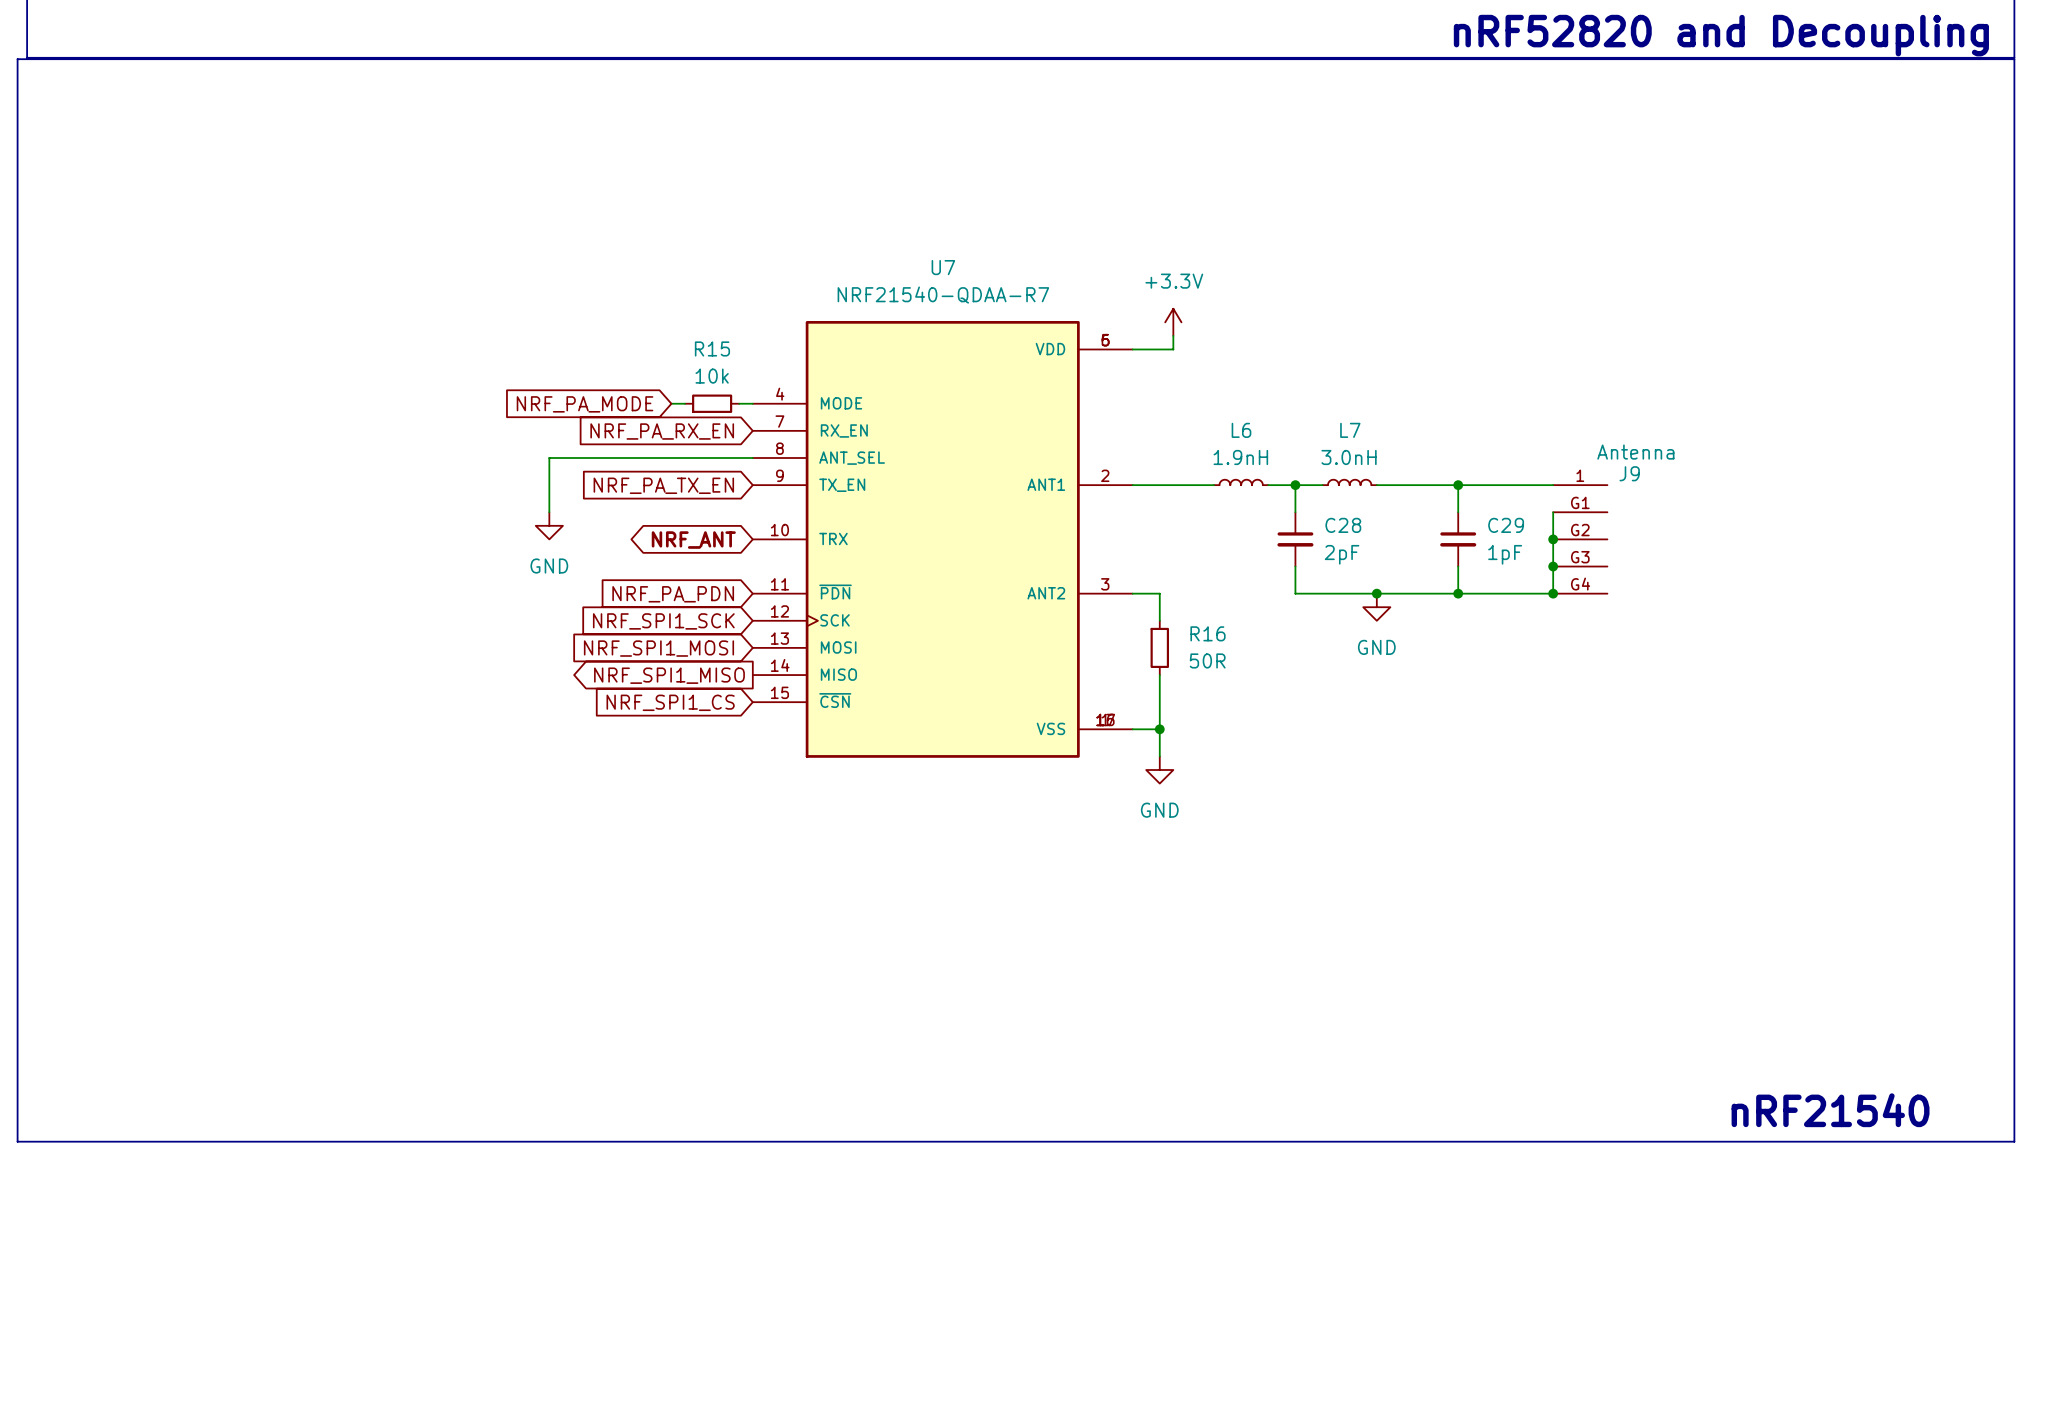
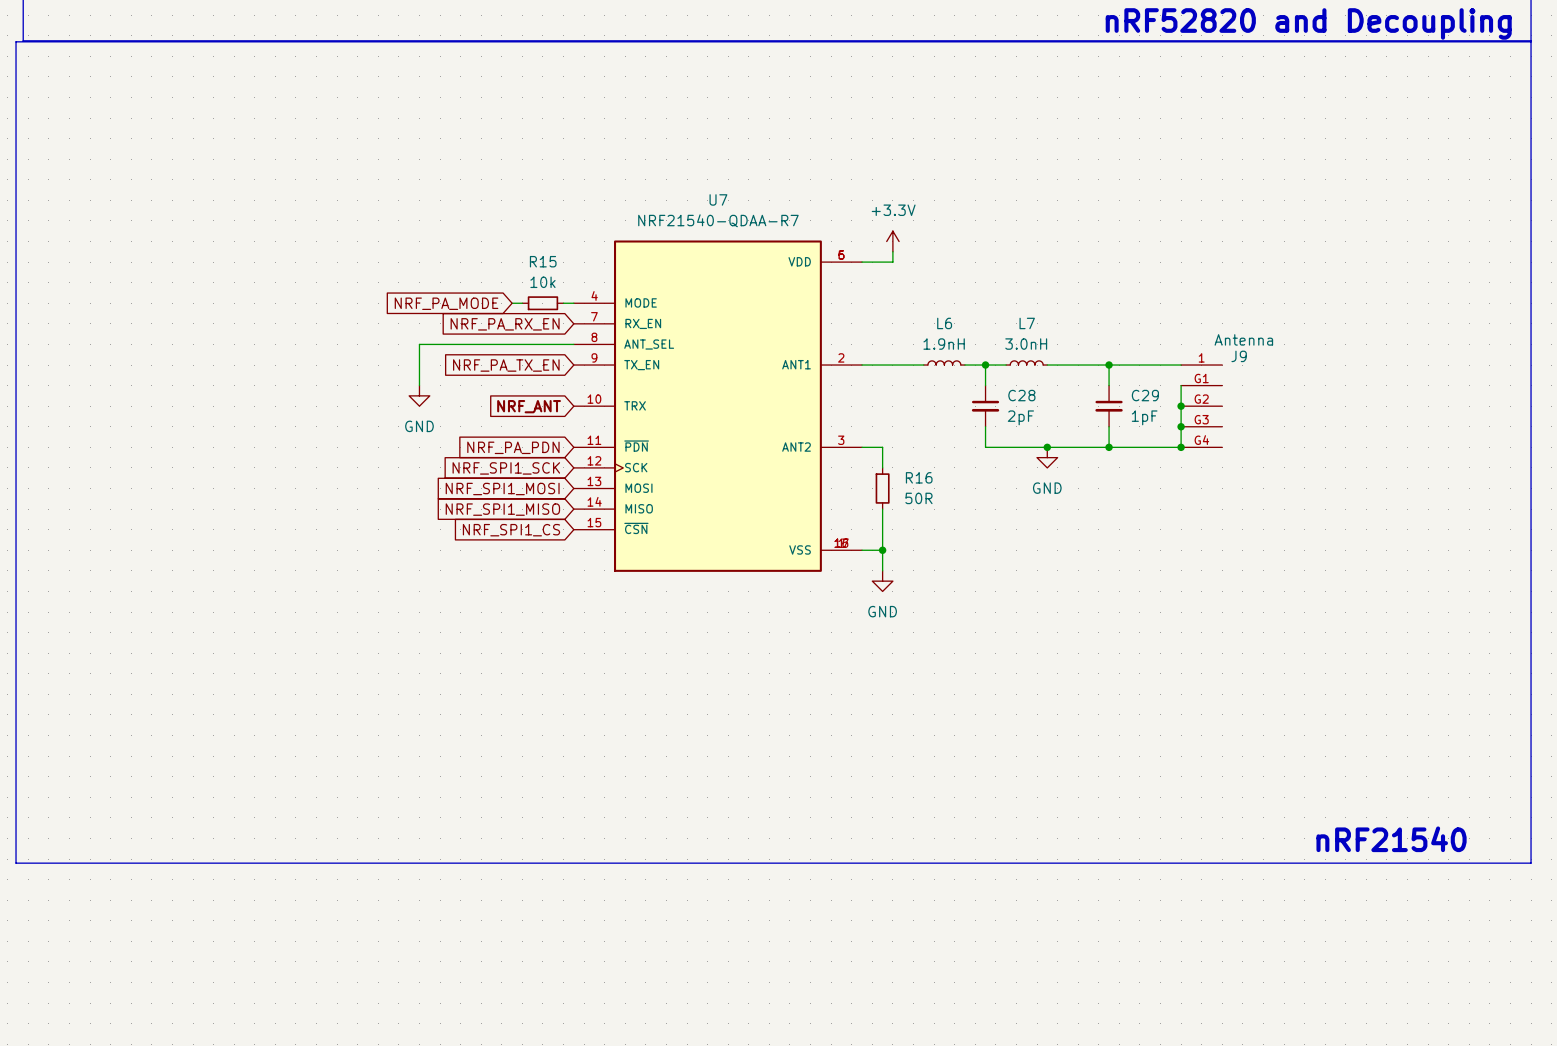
global label shape: bidirectional (693, 540) -> input (529, 406)
global label shape: output (669, 675) -> input (502, 509)

